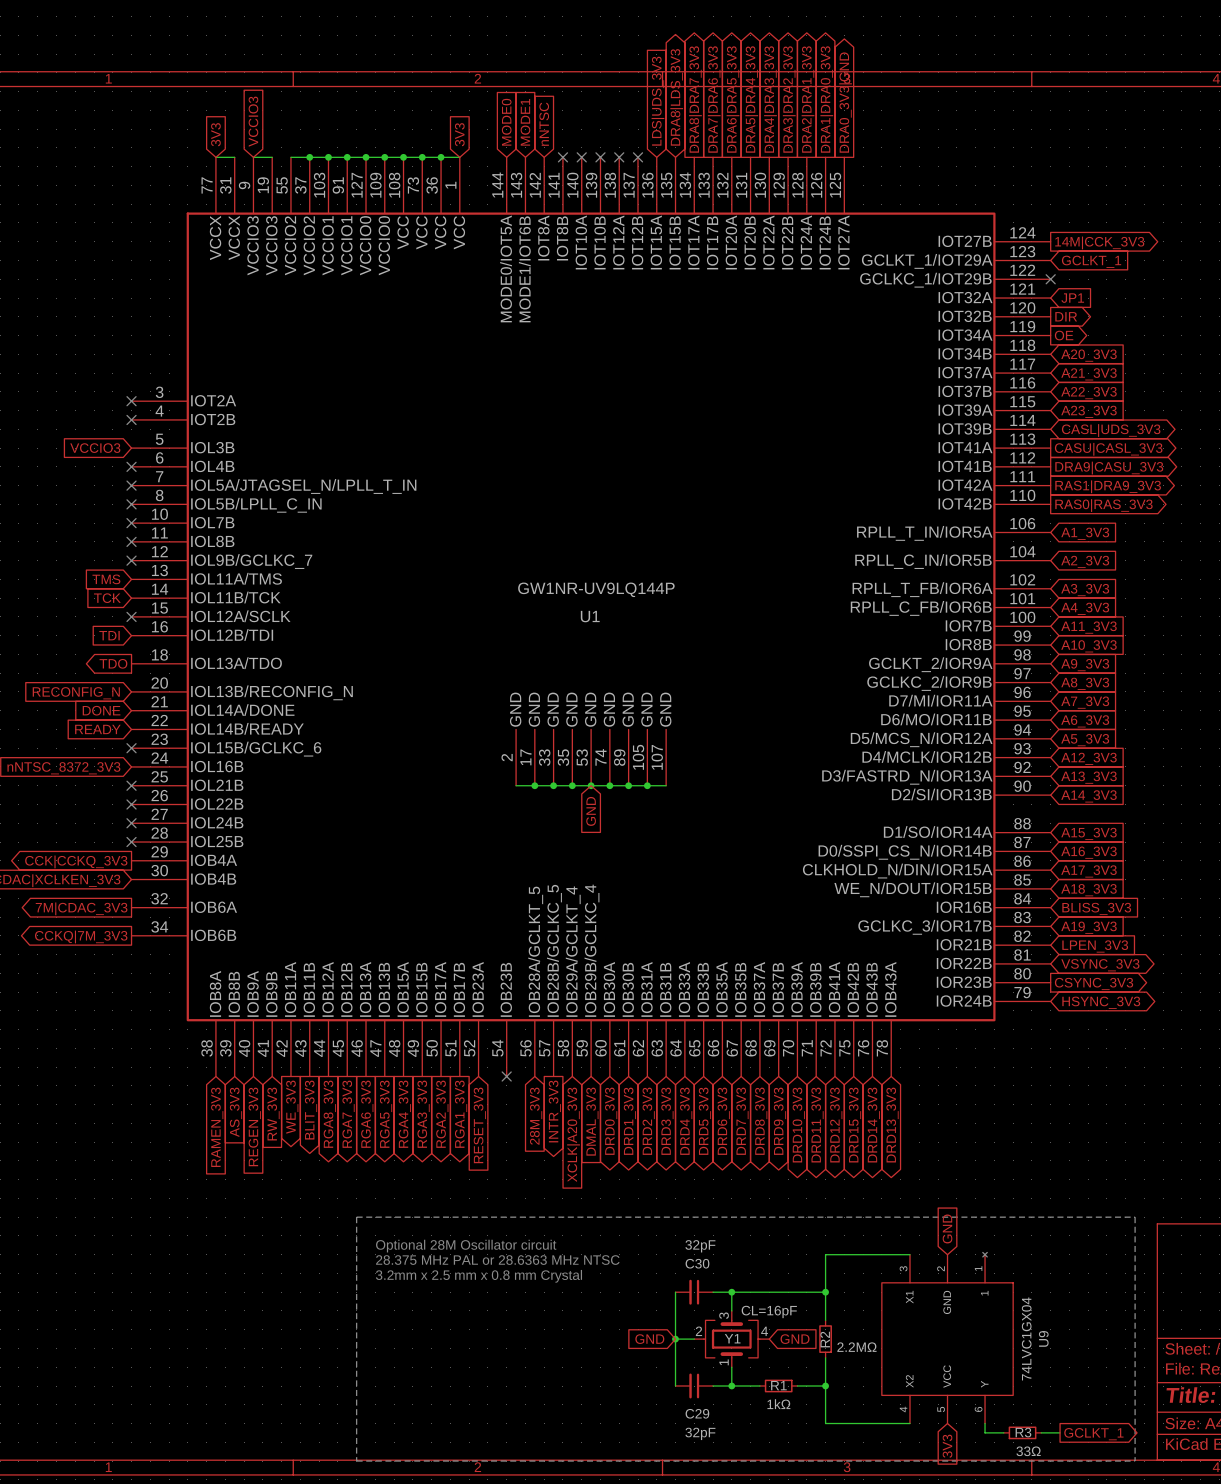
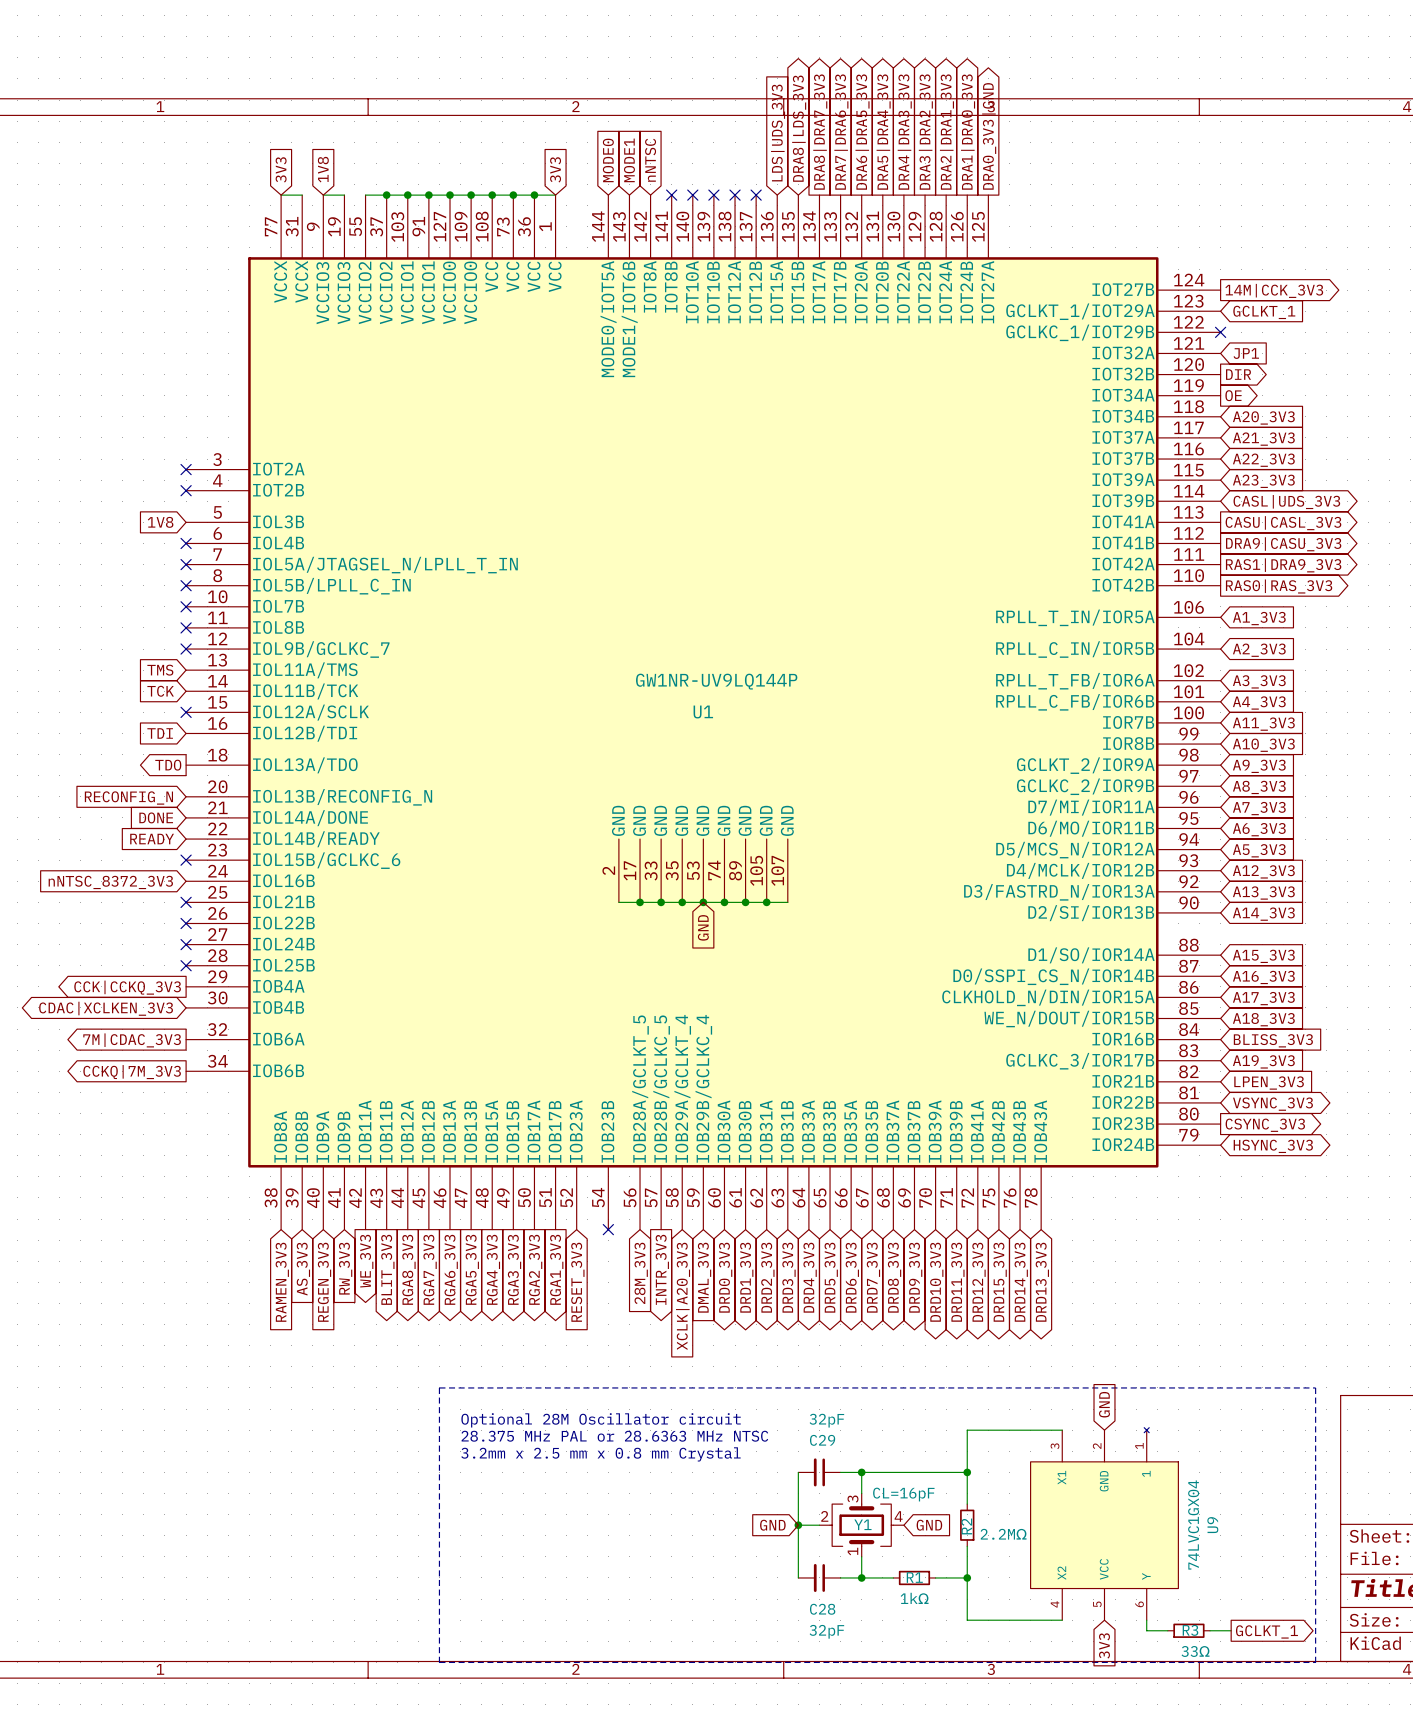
global label: VCCIO3 (253, 121) -> 1V8 (323, 169)
global label: VCCIO3 (95, 448) -> 1V8 (160, 522)
C30 name: C30 (697, 1263) -> C29 (822, 1440)
C29 name: C29 (697, 1413) -> C28 (822, 1609)

